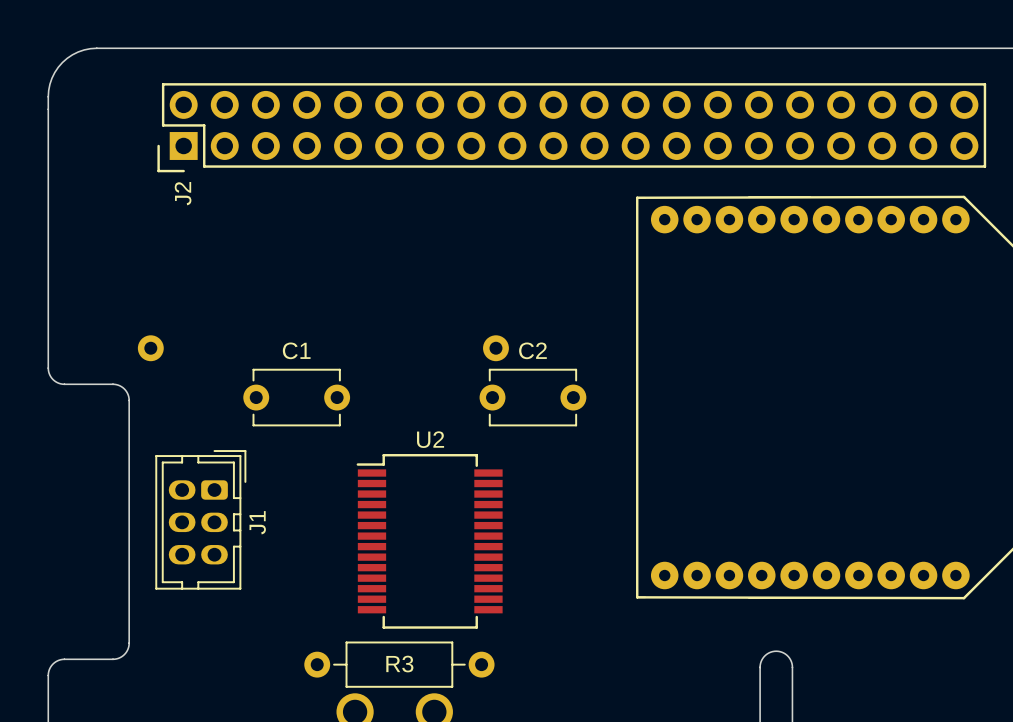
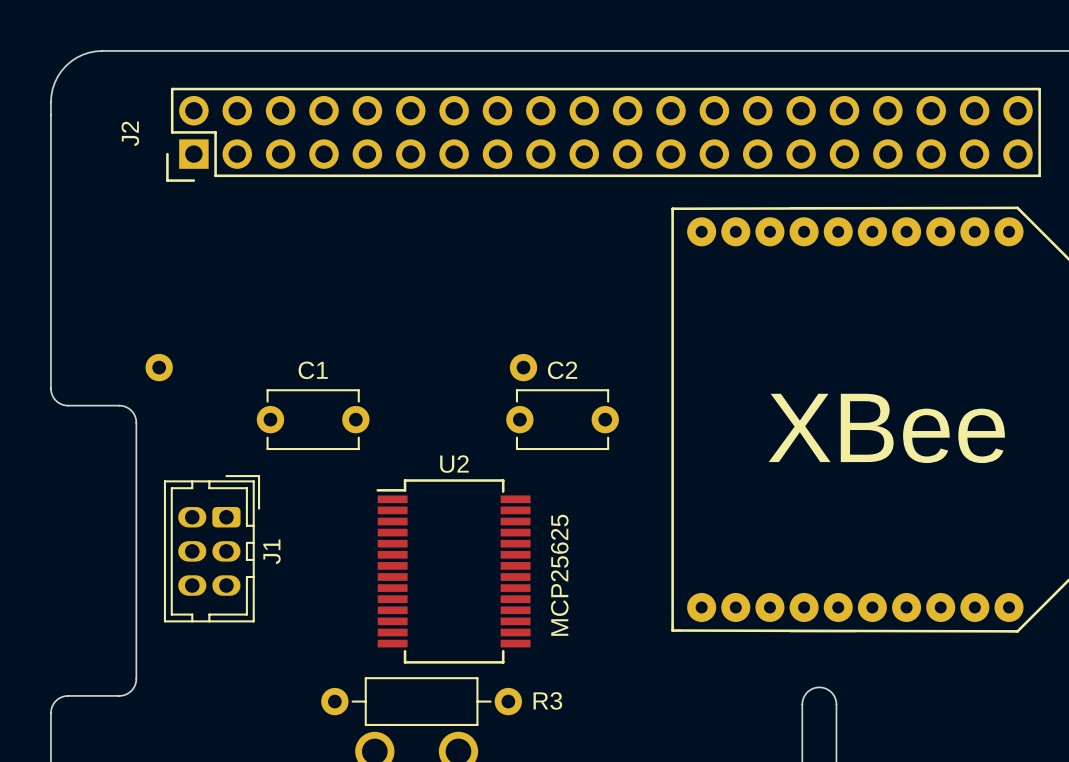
J2 name position: J2 (183, 193) -> J2 (130, 133)
text: none -> XBee (886, 428)
U2 value: none -> MCP25625 (559, 575)
R3 name position: R3 (399, 664) -> R3 (547, 700)

